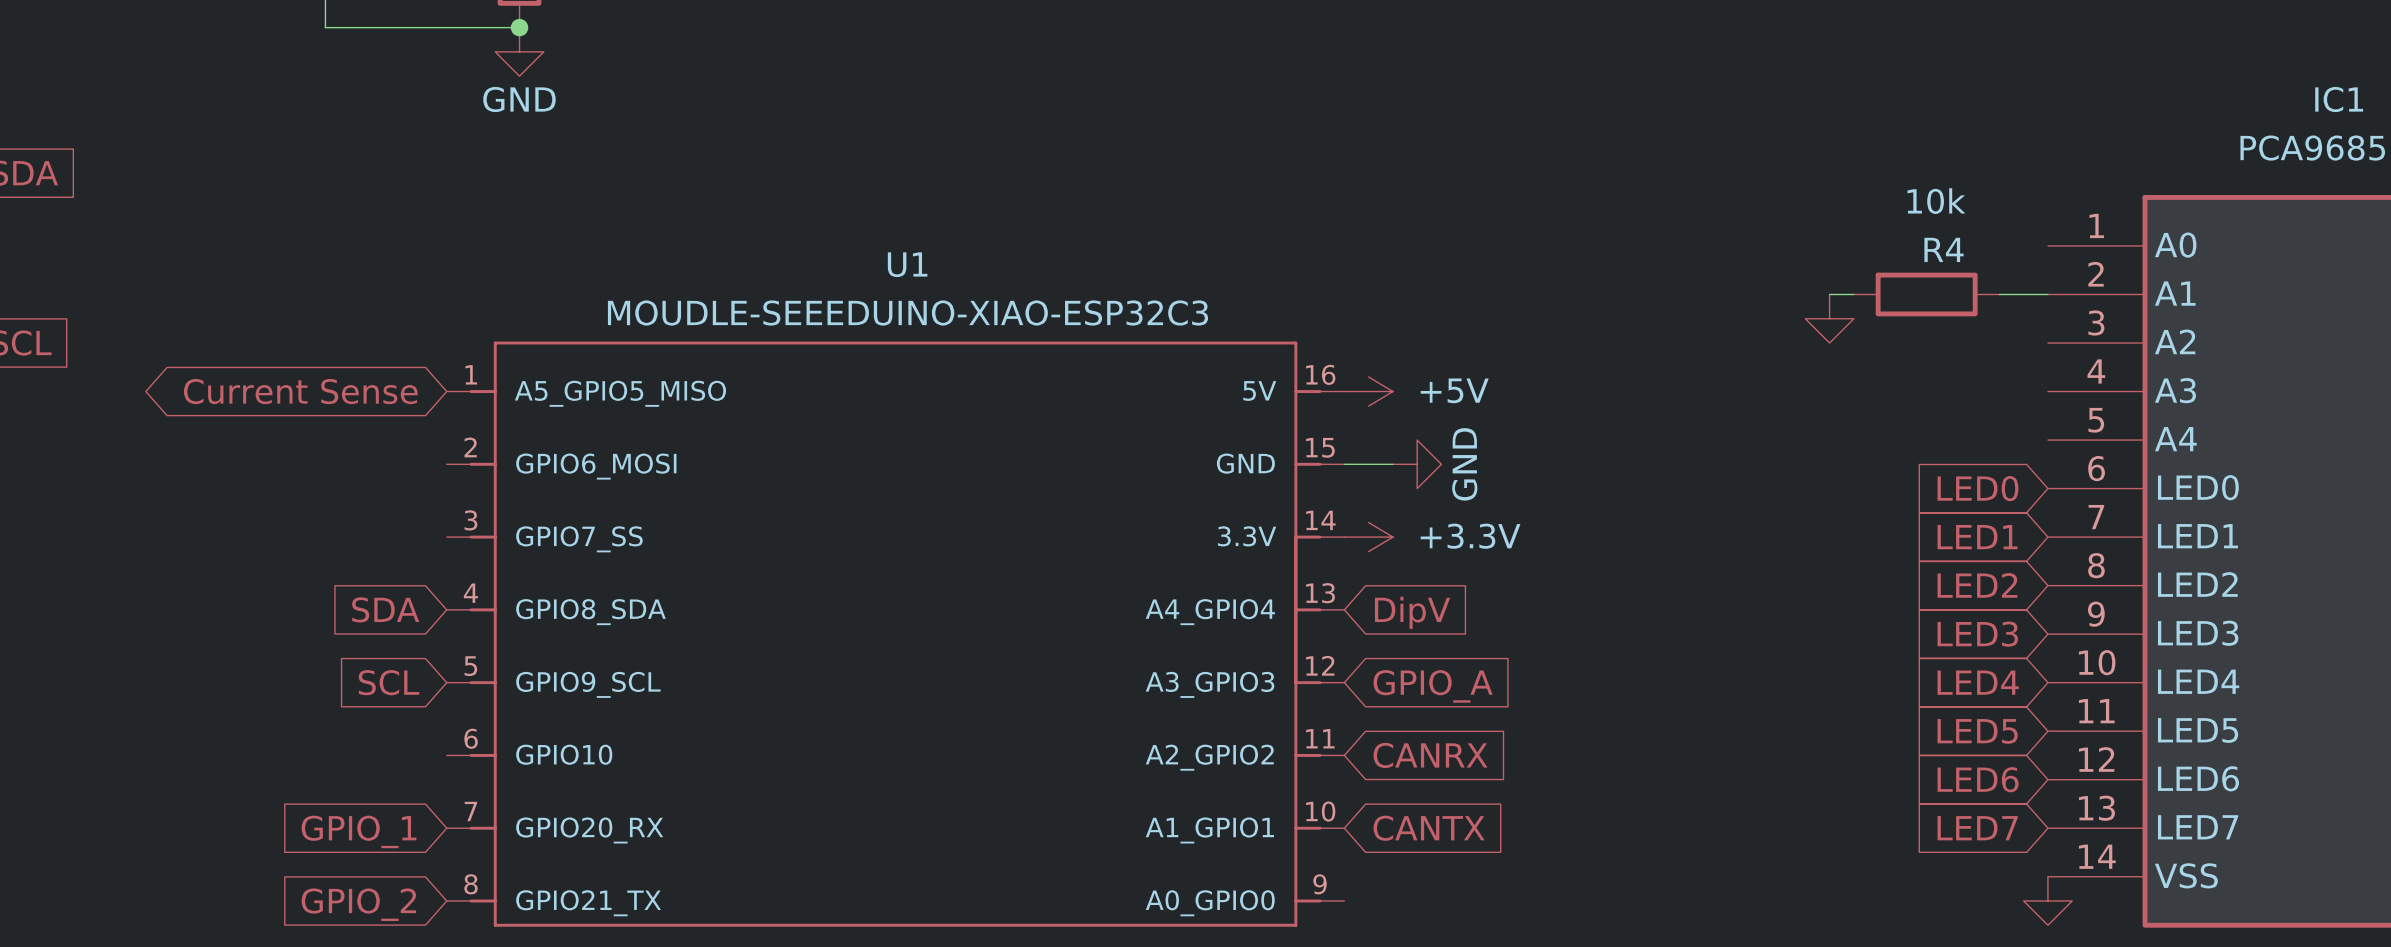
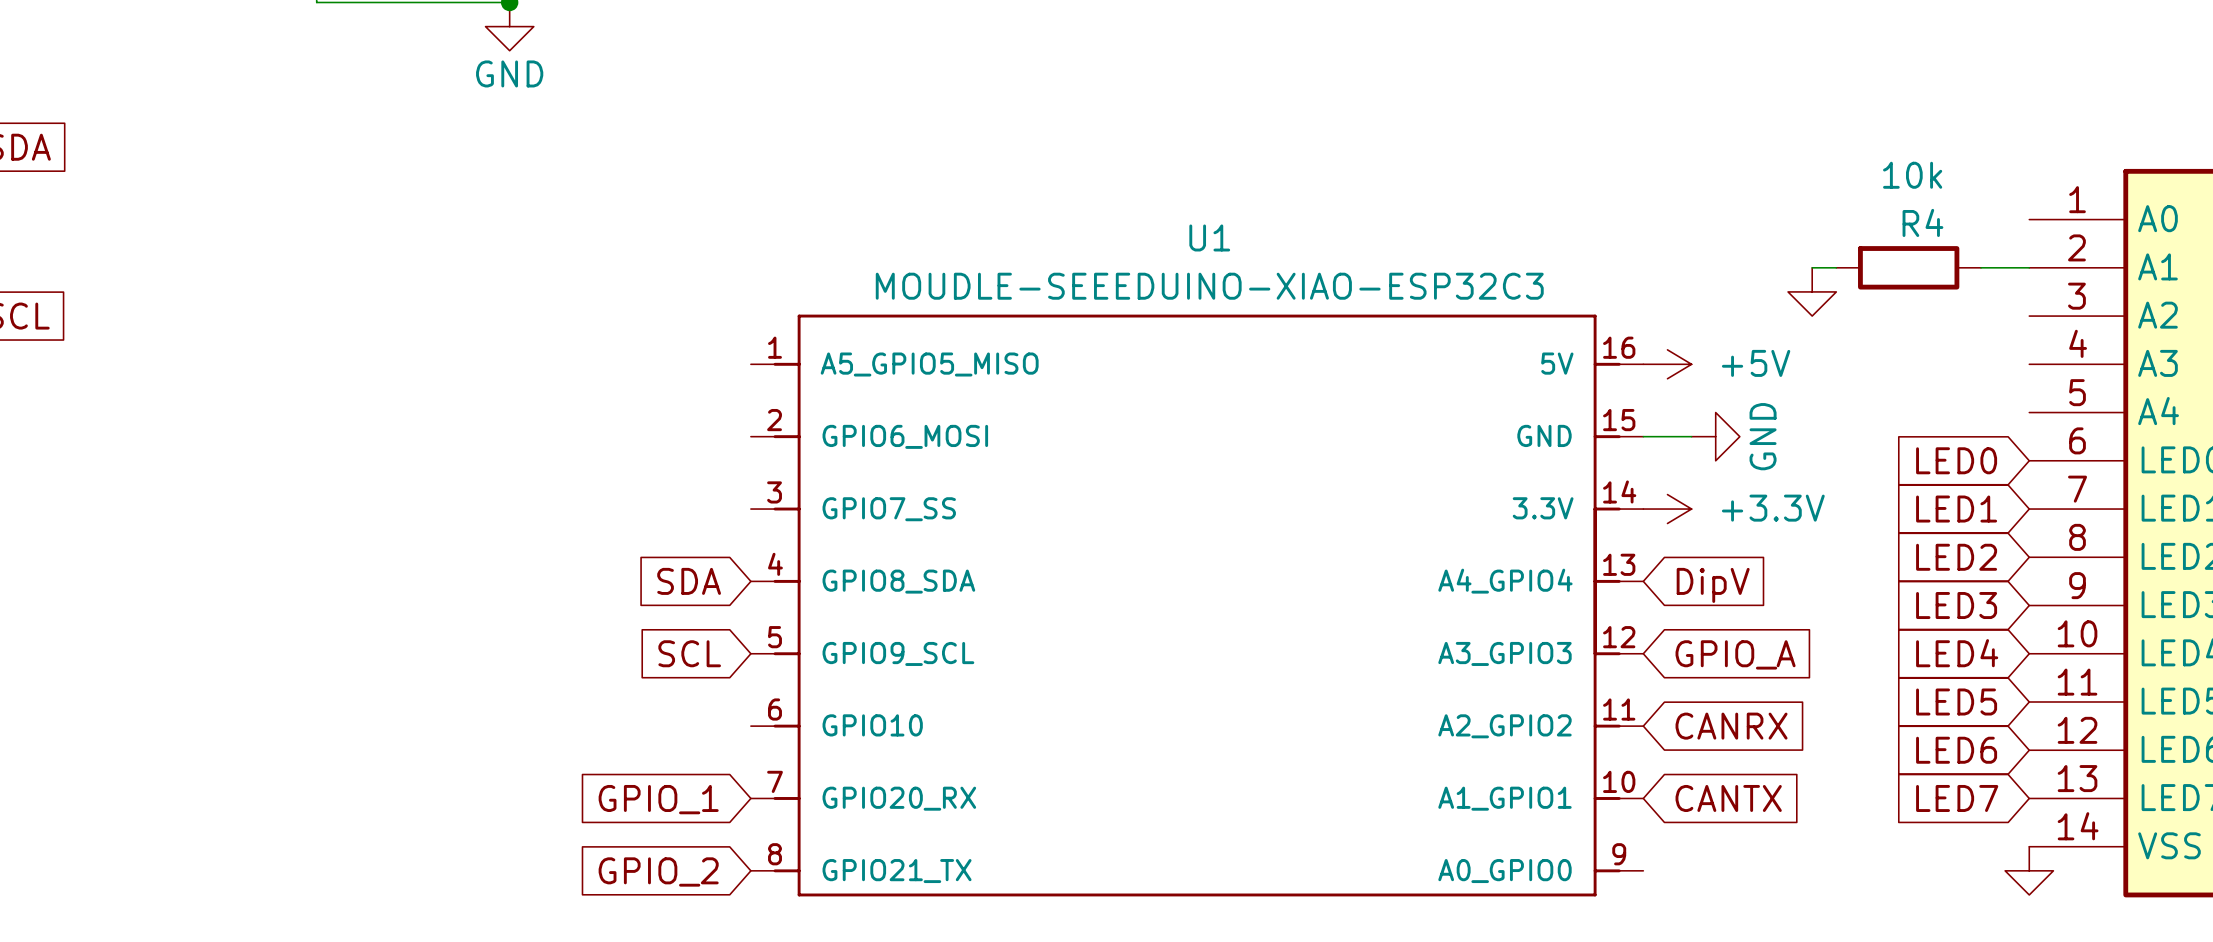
global label: Current Sense (300, 391) -> none
power symbol position: +5V (1368, 391) -> +5V (1667, 364)
wire: (1344, 464) (1392, 464) -> (1643, 436) (1691, 436)
power symbol position: GND (1417, 464) -> GND (1715, 436)
power symbol position: +3.3V (1368, 537) -> +3.3V (1667, 509)
global label position: SDA (385, 609) -> SDA (689, 581)
global label position: DipV (1412, 612) -> DipV (1713, 585)
U1 position: (895, 634) -> (1197, 605)
global label position: SCL (389, 682) -> SCL (689, 653)
global label position: GPIO_A (1433, 686) -> GPIO_A (1735, 654)
global label position: CANRX (1430, 755) -> CANRX (1731, 726)
global label position: CANTX (1429, 828) -> CANTX (1728, 798)
global label position: GPIO_1 (359, 831) -> GPIO_1 (658, 799)
global label position: GPIO_2 (358, 904) -> GPIO_2 (658, 871)

